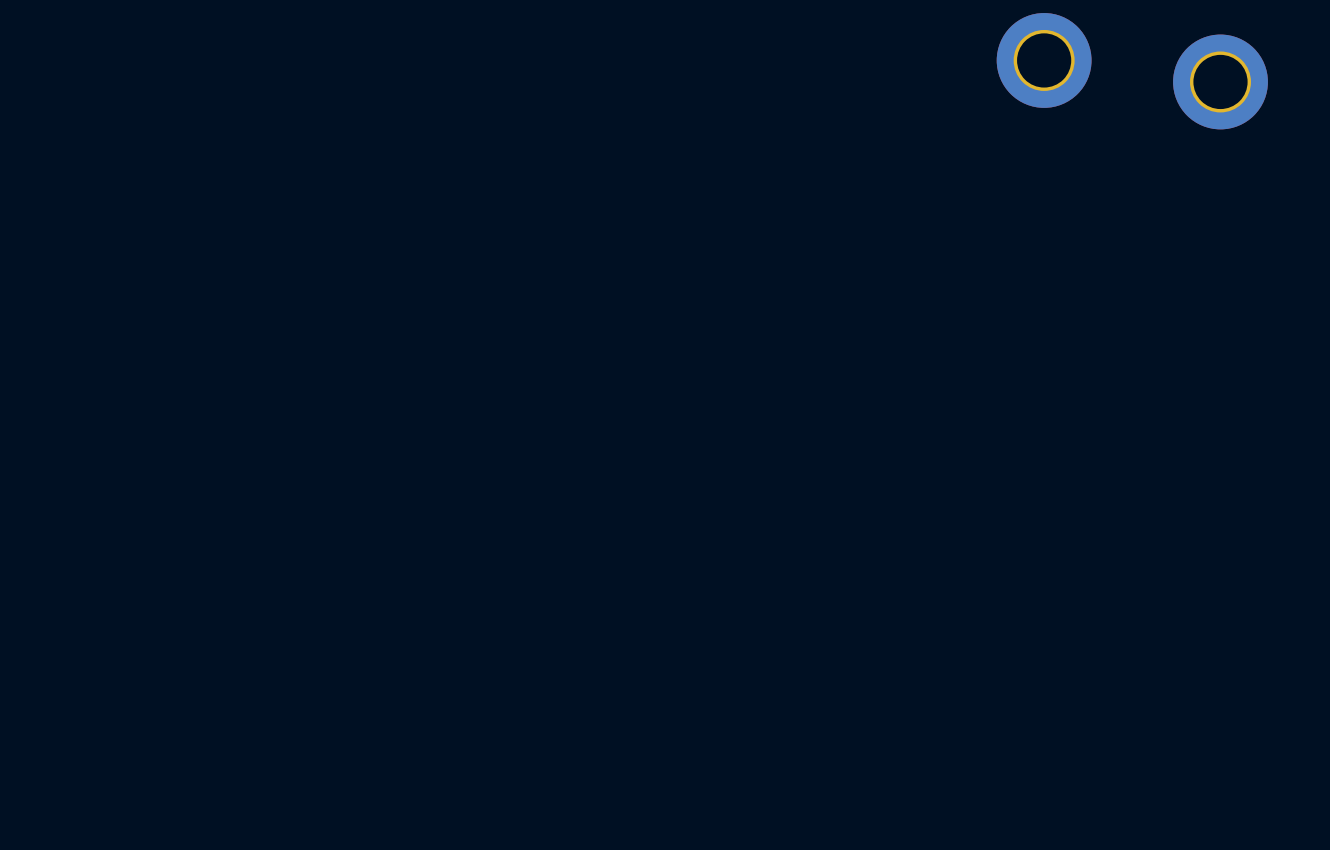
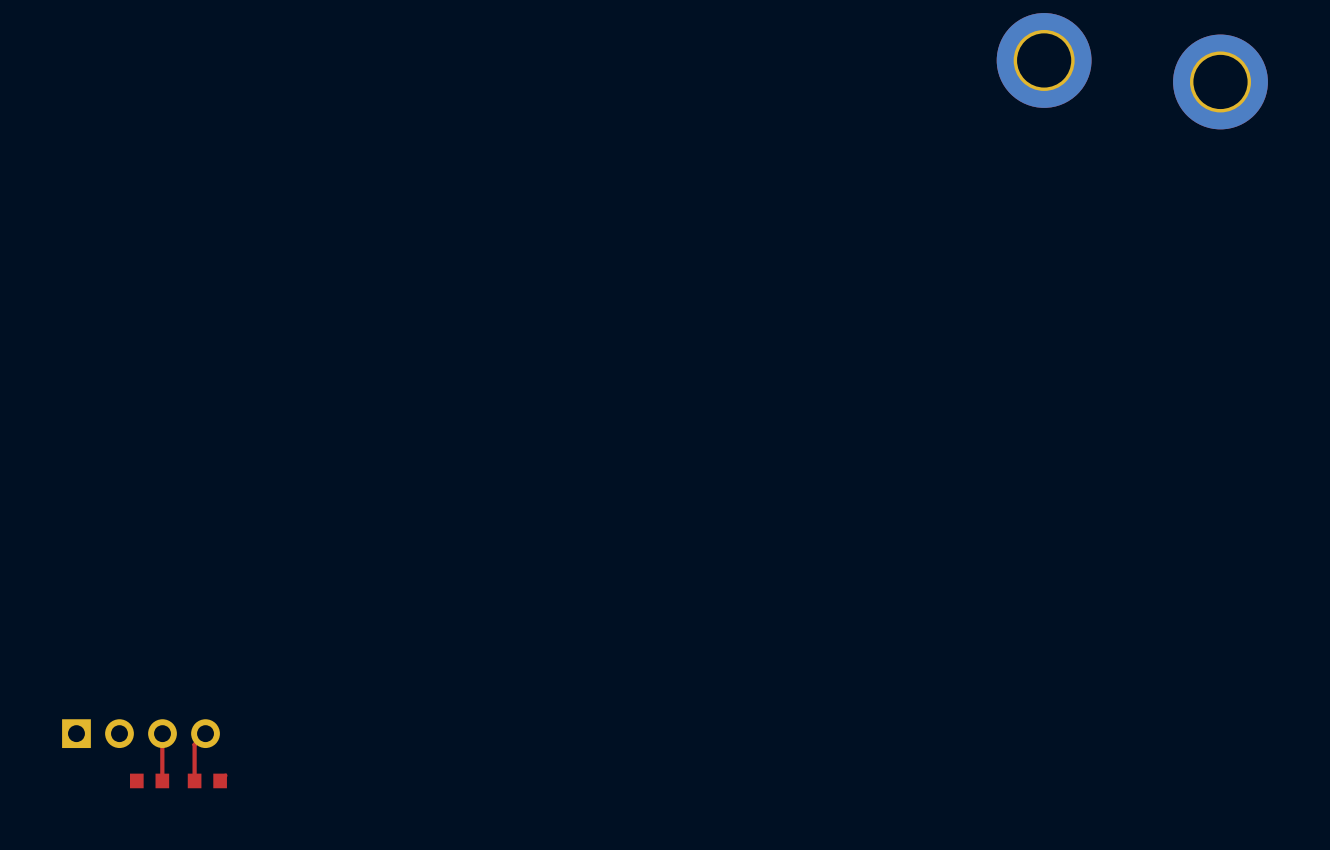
part: none -> (141, 733)
top track: none -> (162, 733) (162, 780)
top track: none -> (205, 733) (194, 744) (194, 780)
part: none -> (149, 780)
part: none -> (207, 780)

